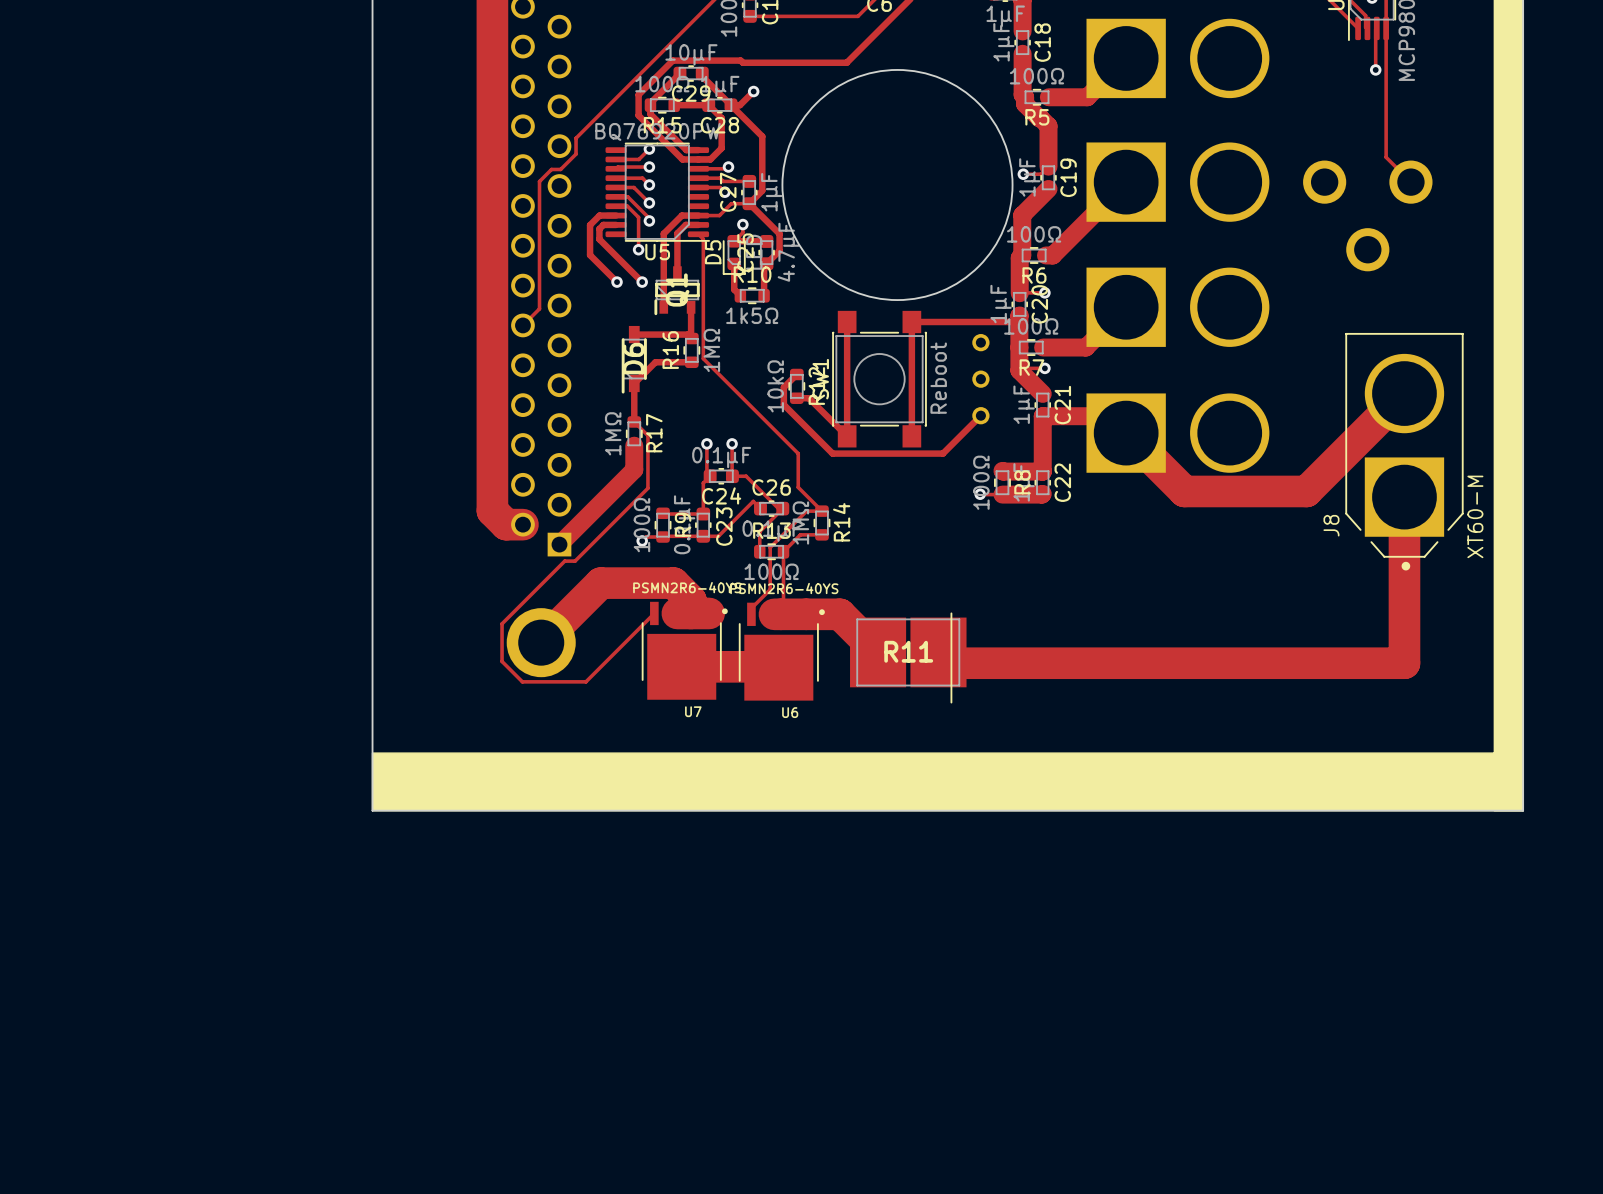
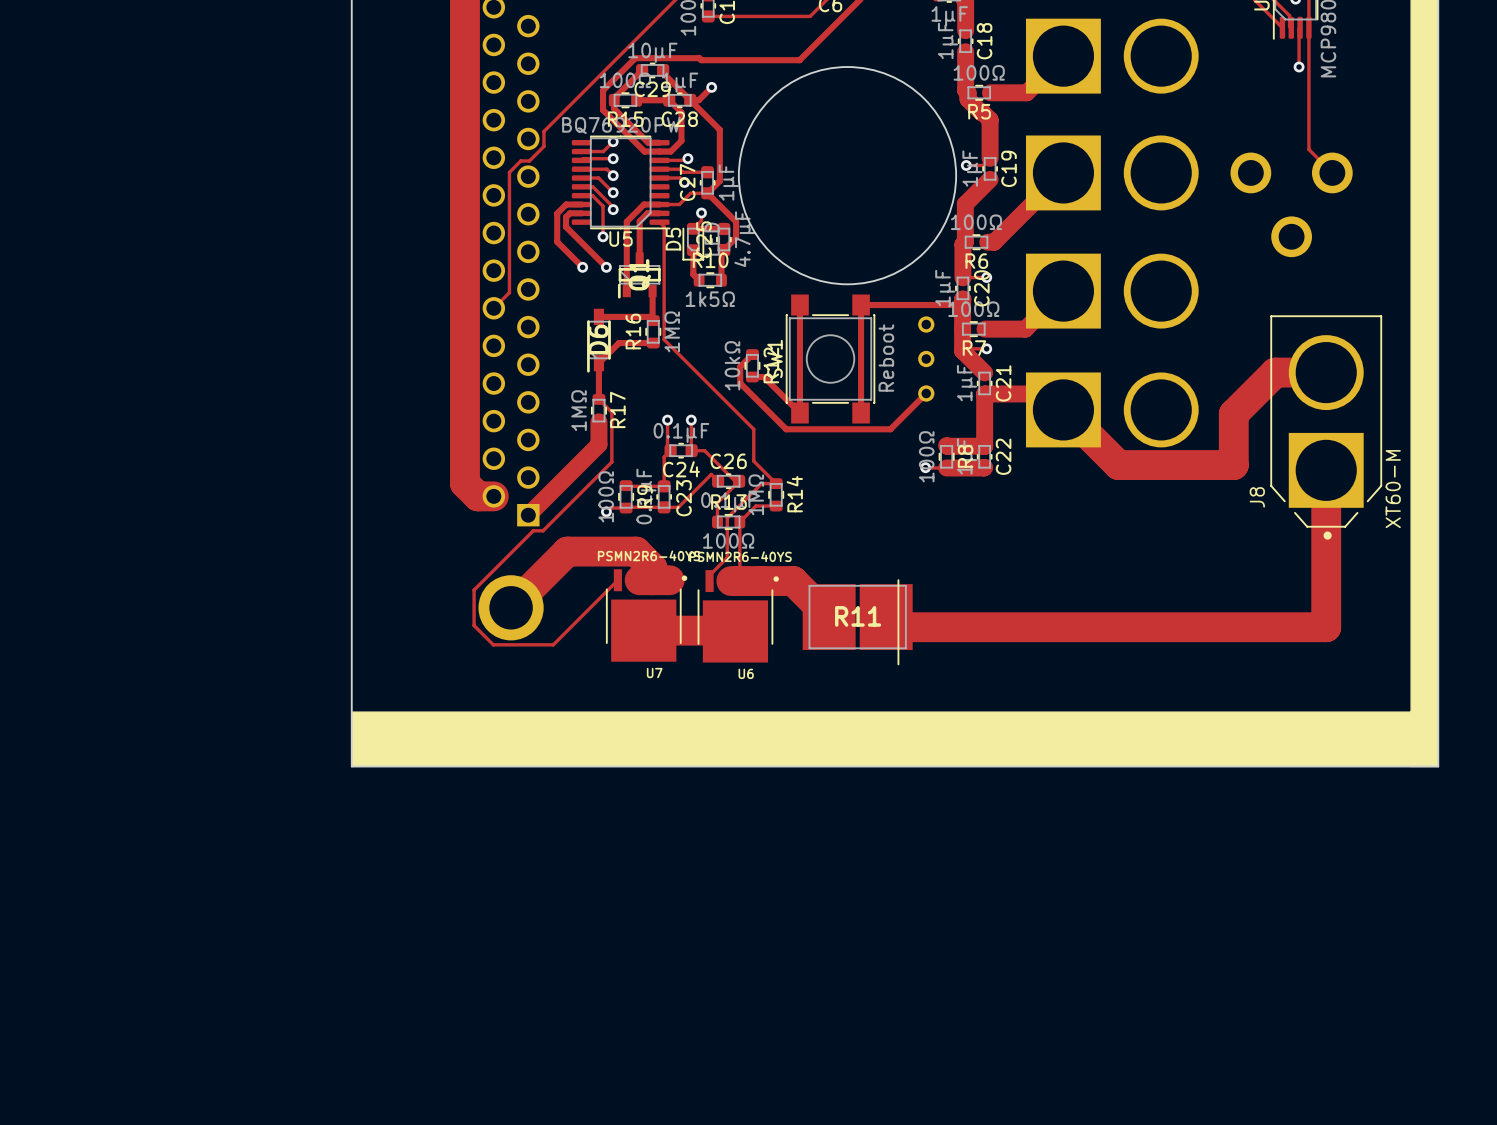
track: (1404, 393) (1306, 491) -> (1326, 372) (1275, 372) (1233, 414) (1233, 465)

